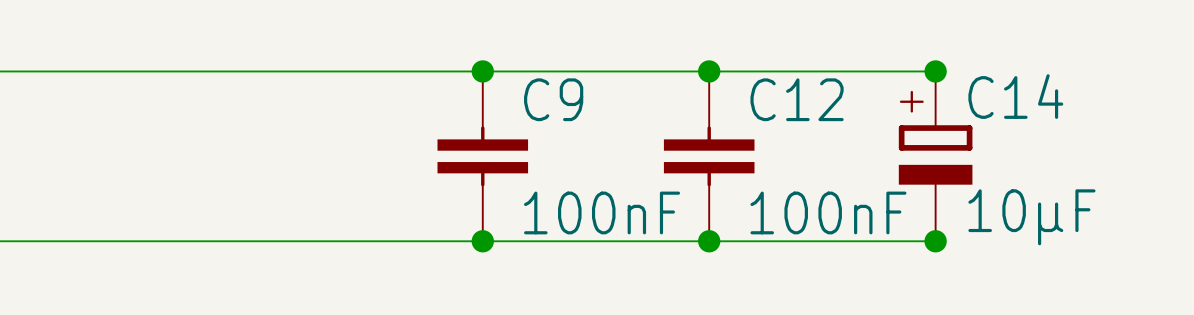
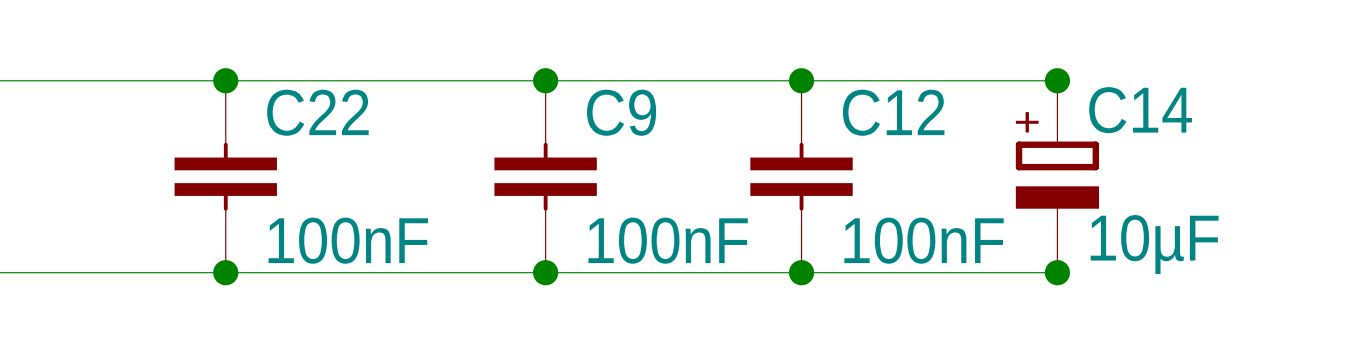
junction: none -> (225, 80)
C22: none -> 100nF (225, 176)
junction: none -> (225, 272)

